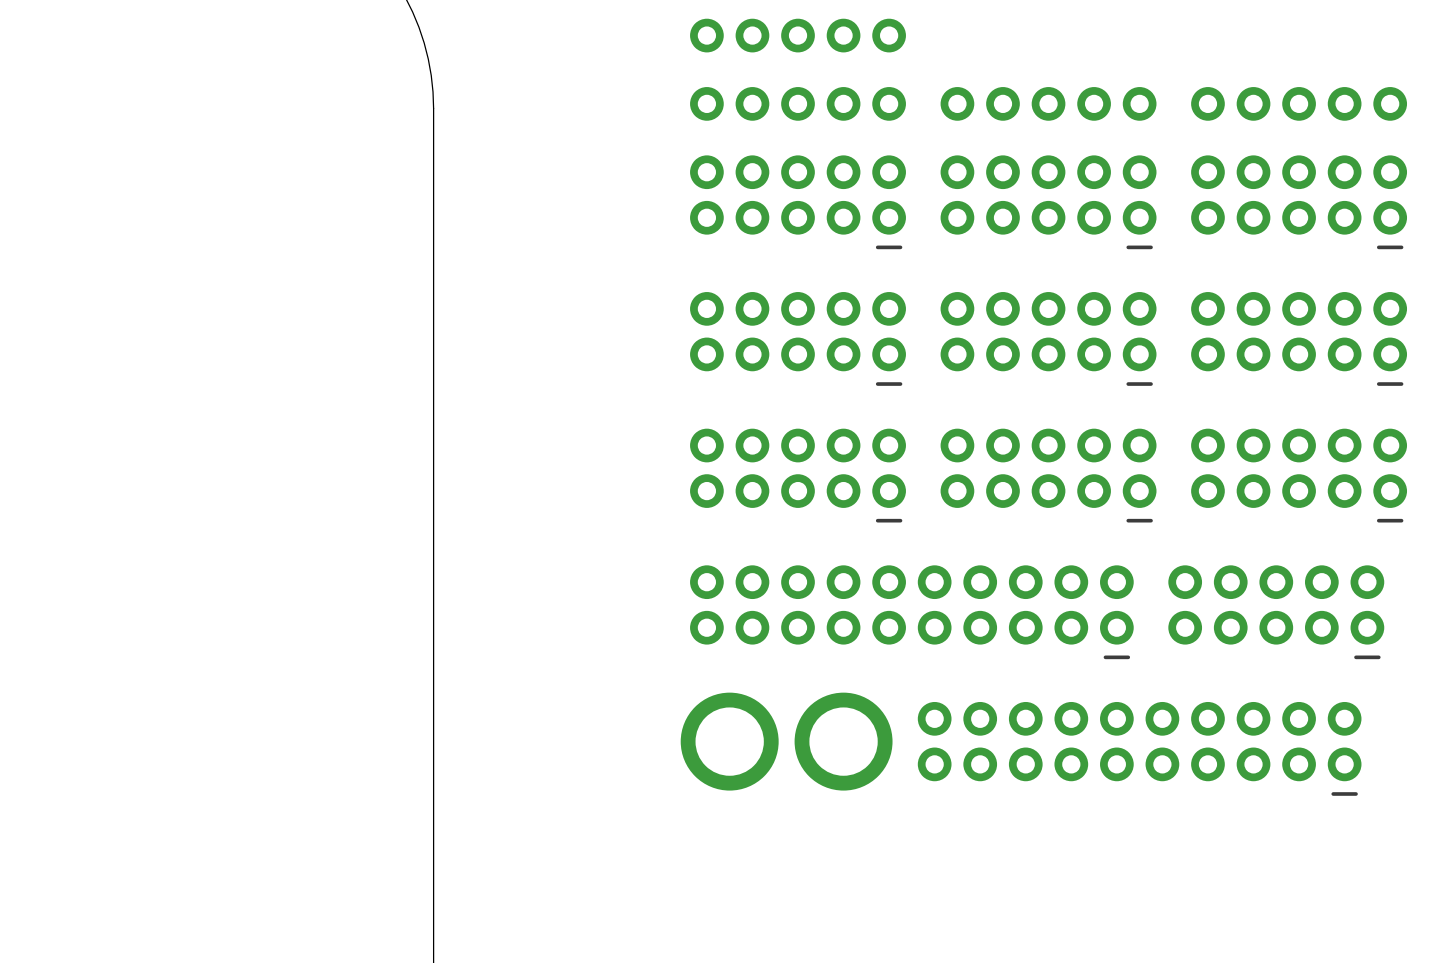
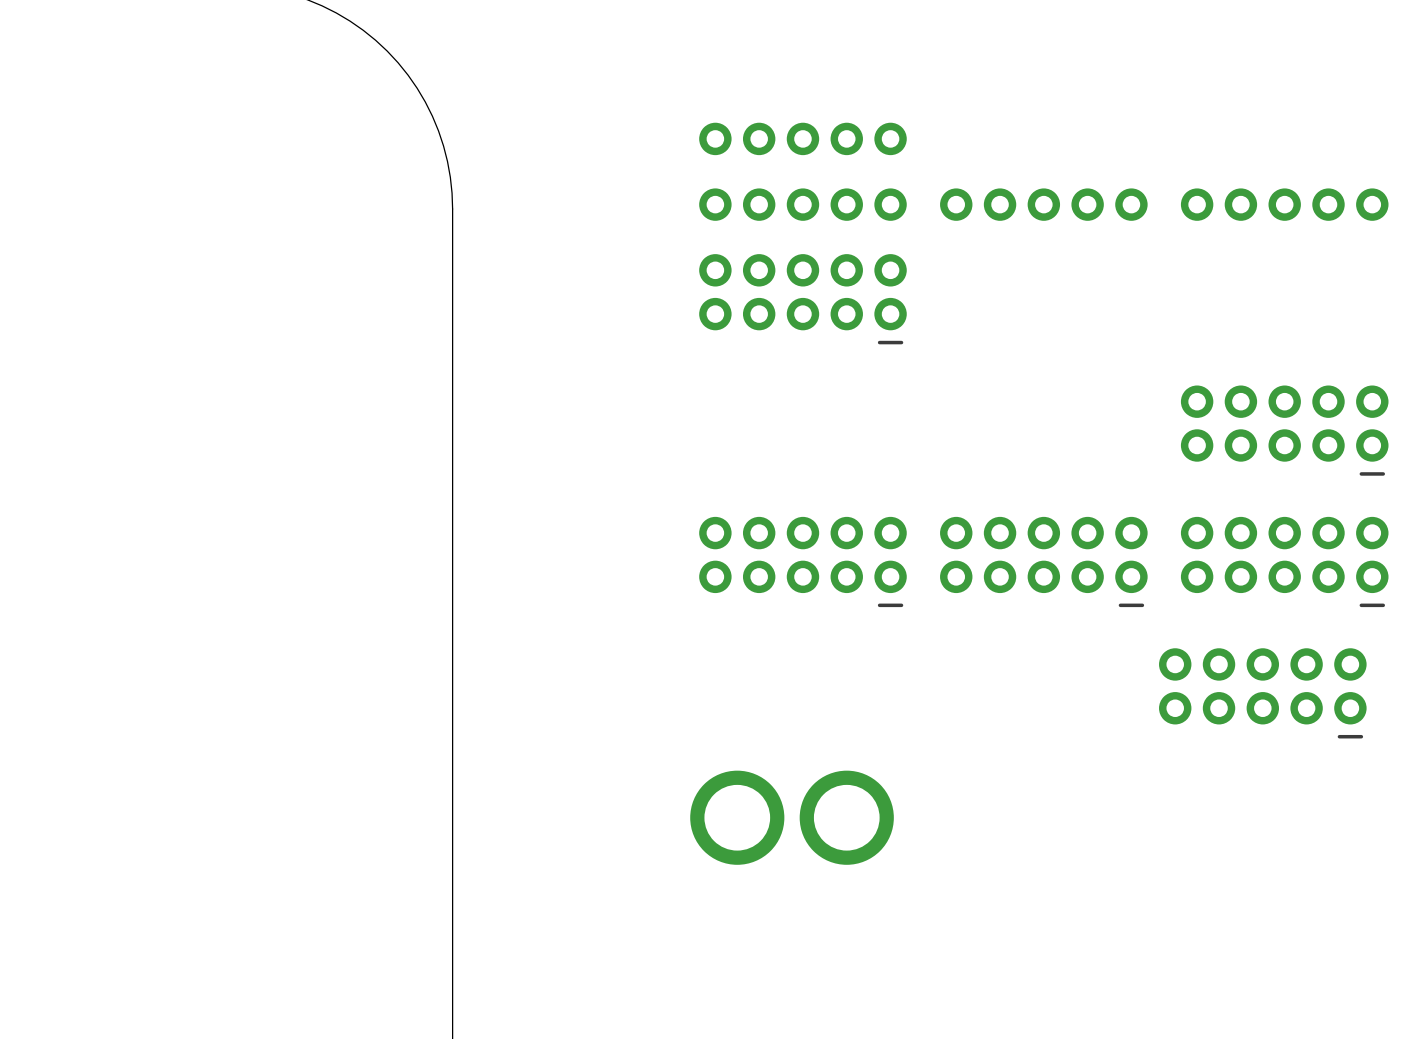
part: (1048, 202) -> none
part: (1299, 202) -> none
part: (798, 338) -> none
part: (1048, 338) -> none
part: (911, 612) -> none
part: (1139, 748) -> none

